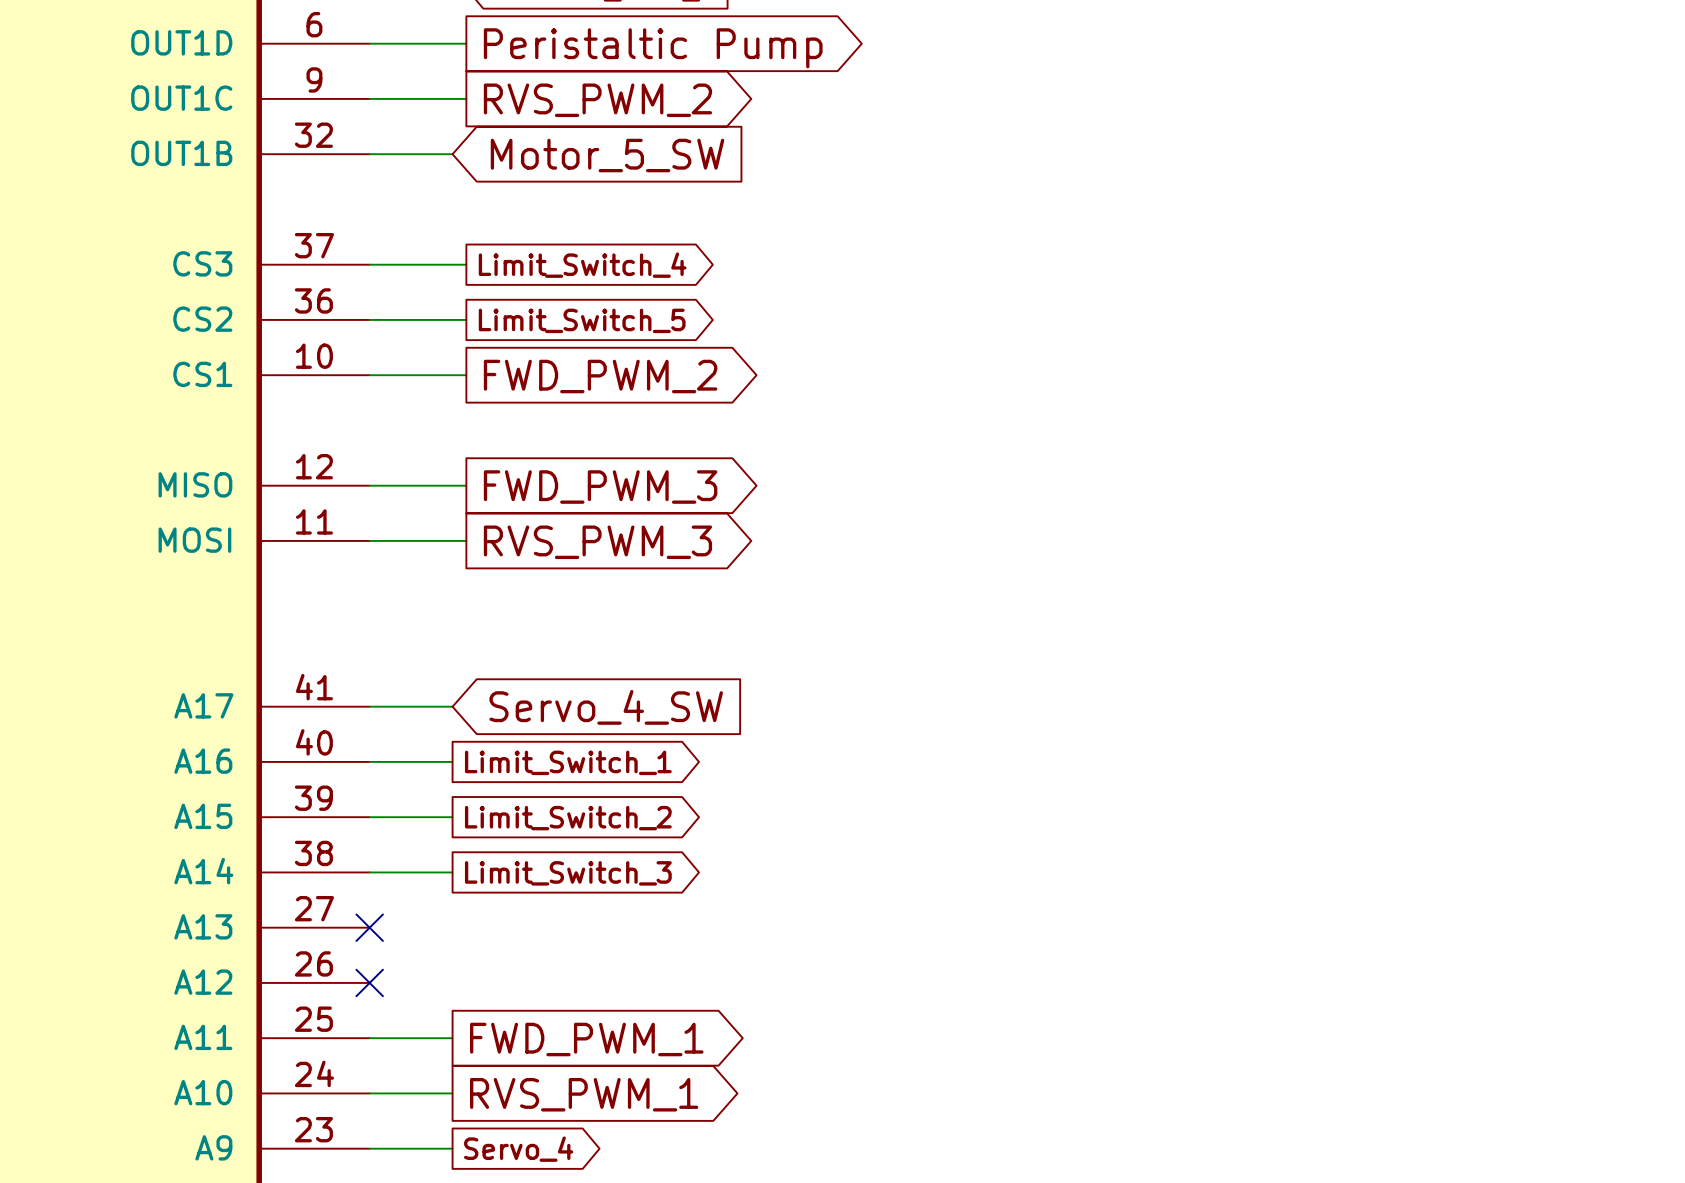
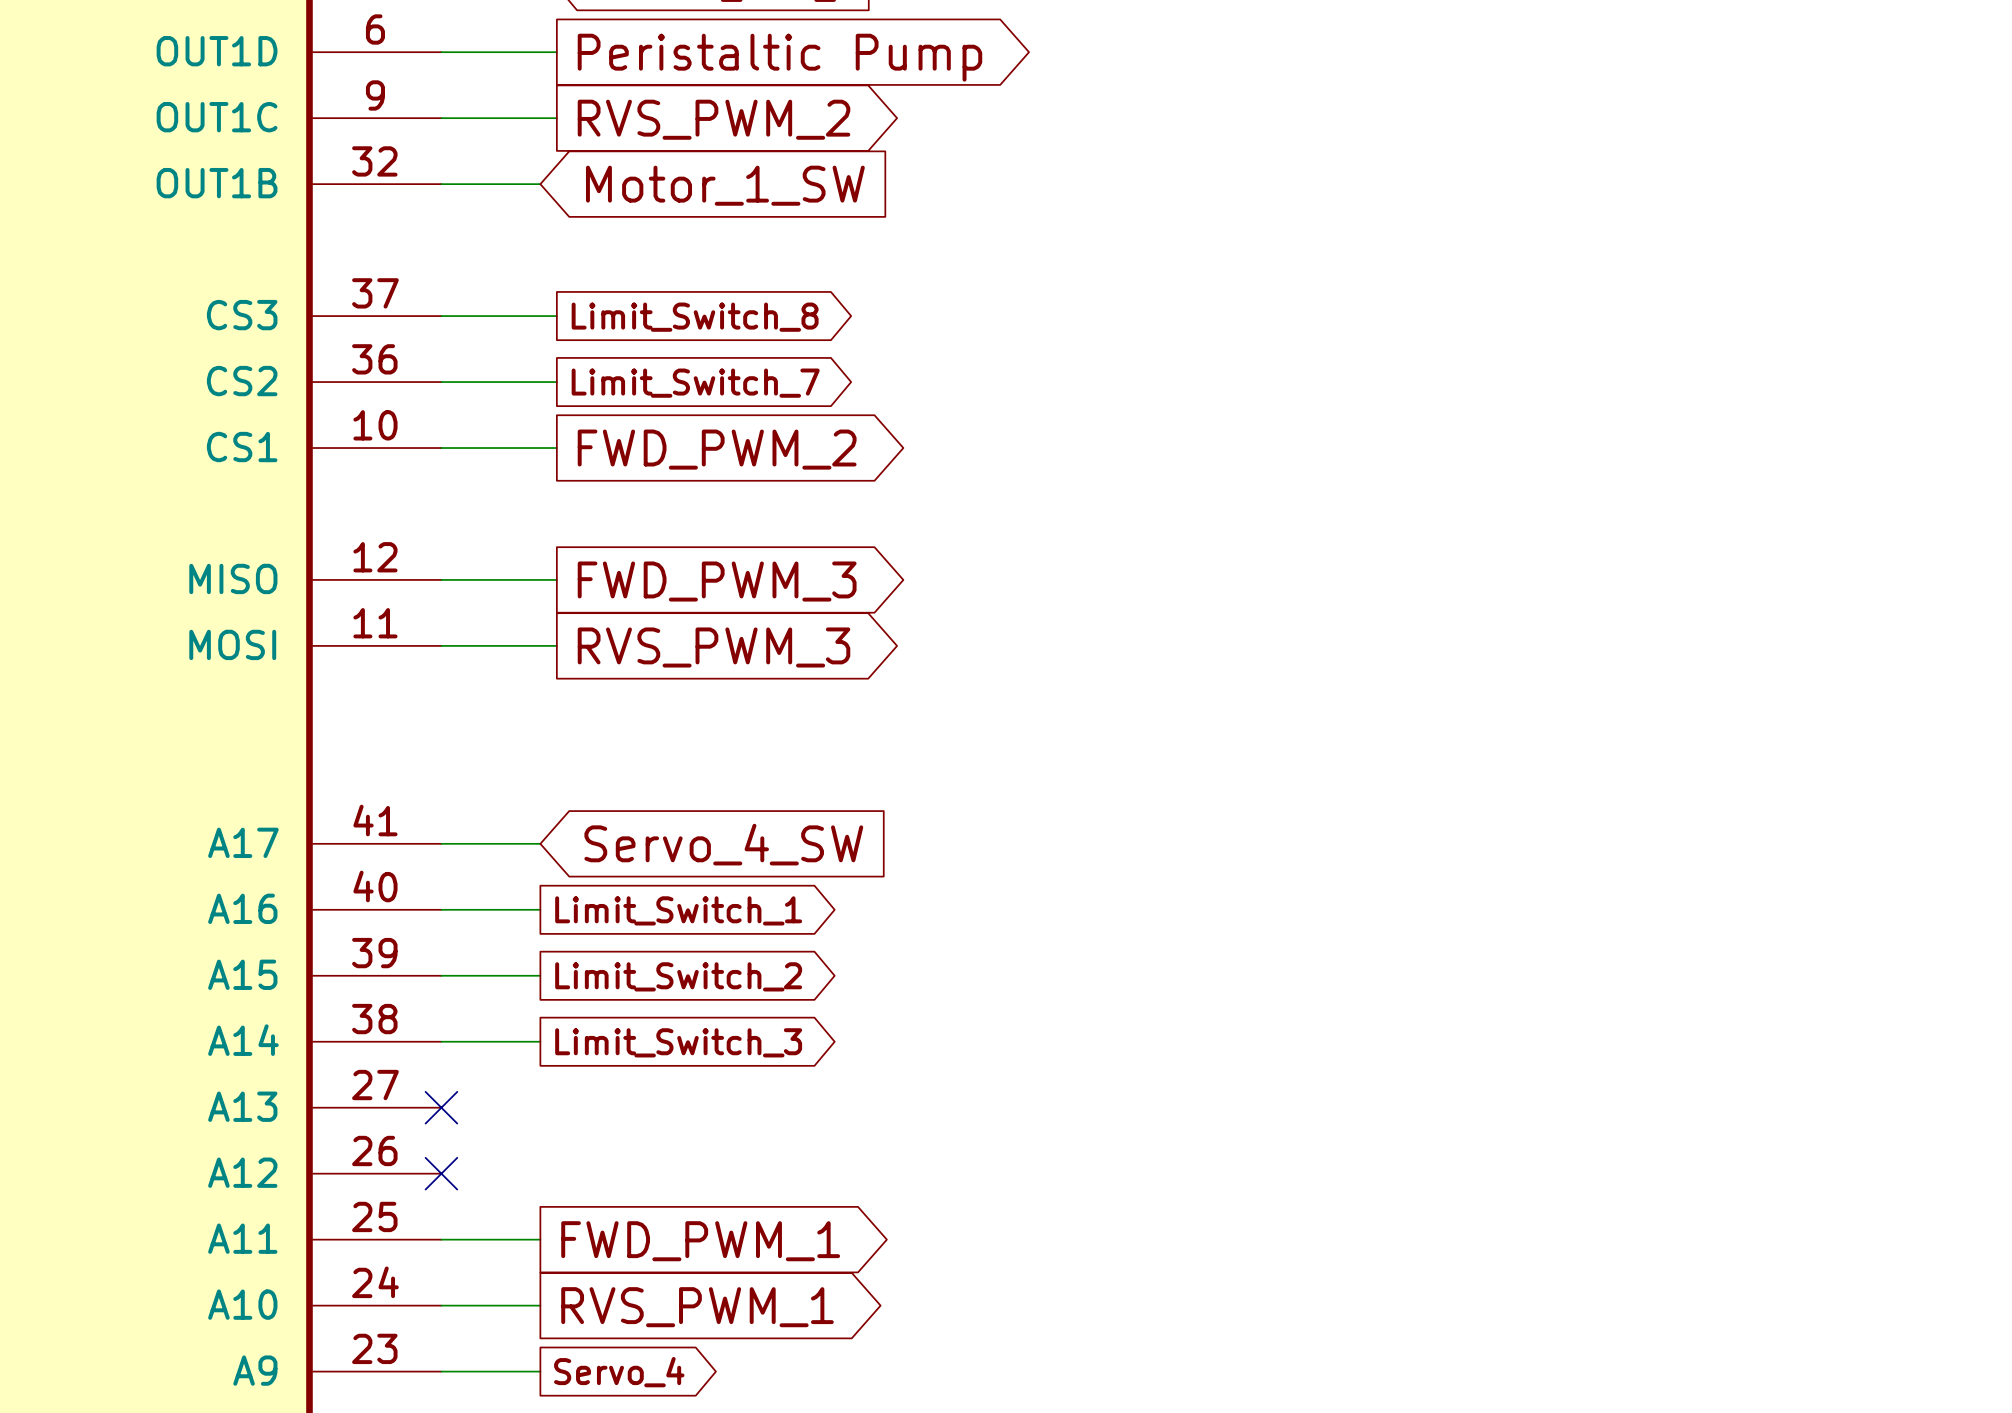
global label: Motor_5_SW (607, 155) -> Motor_1_SW (725, 185)
global label: Limit_Switch_4 (582, 265) -> Limit_Switch_8 (695, 317)
global label: Limit_Switch_5 (582, 320) -> Limit_Switch_7 (695, 383)

